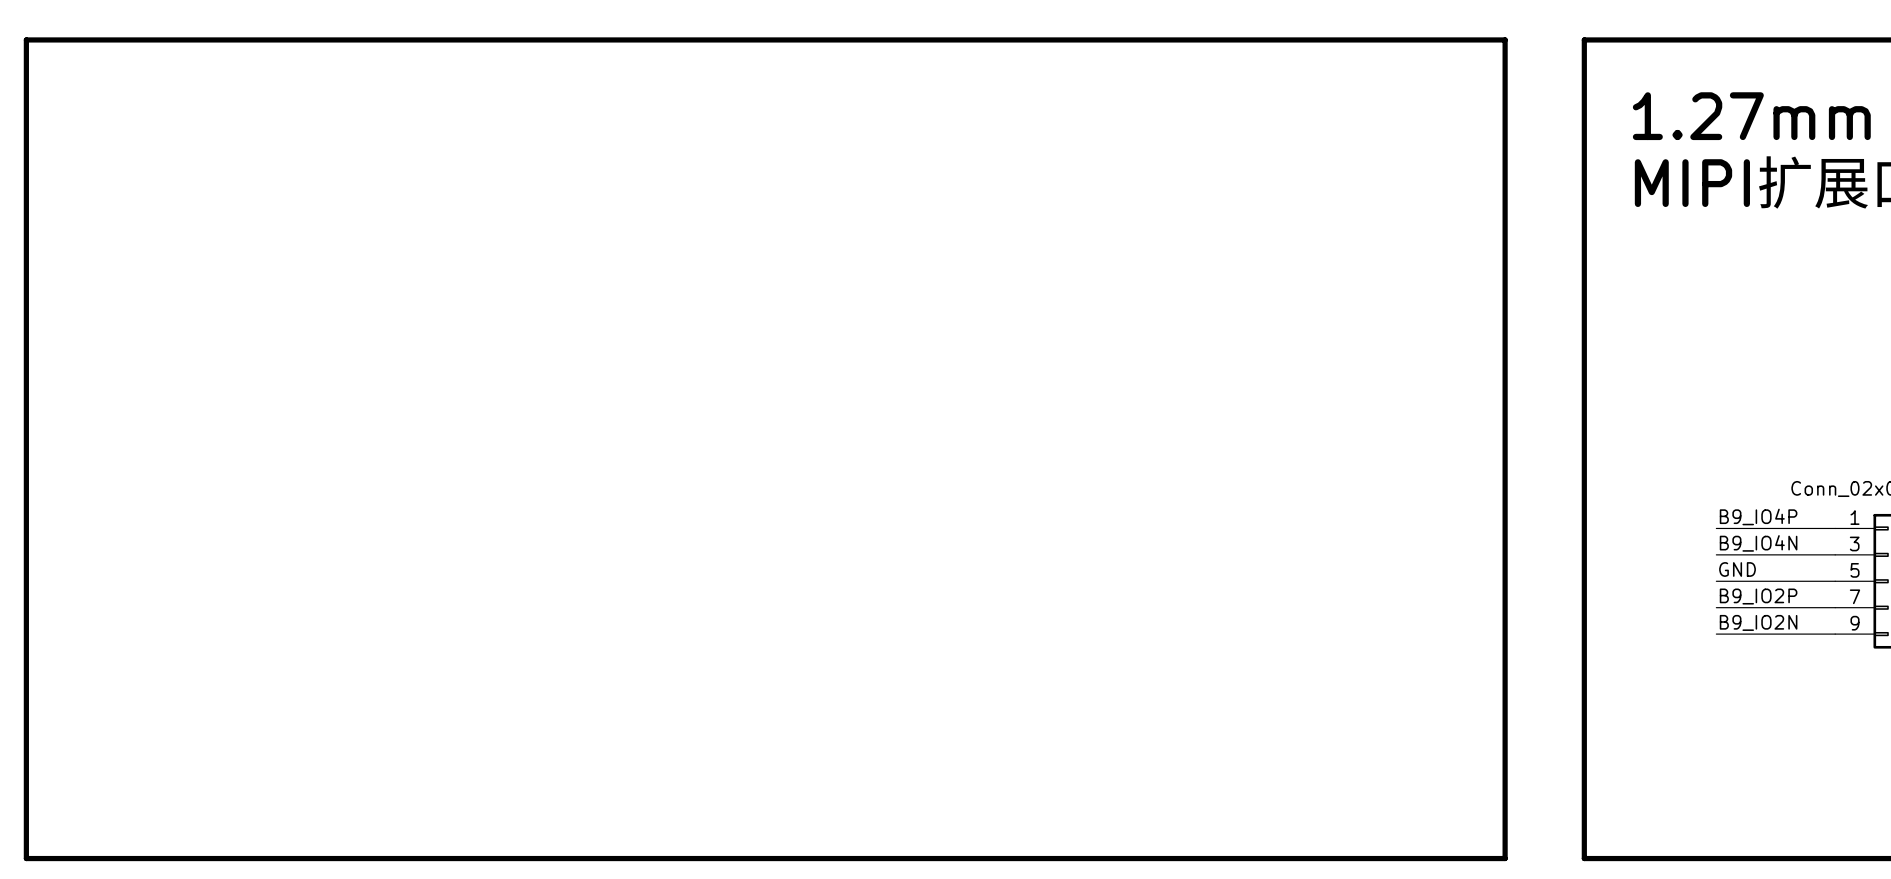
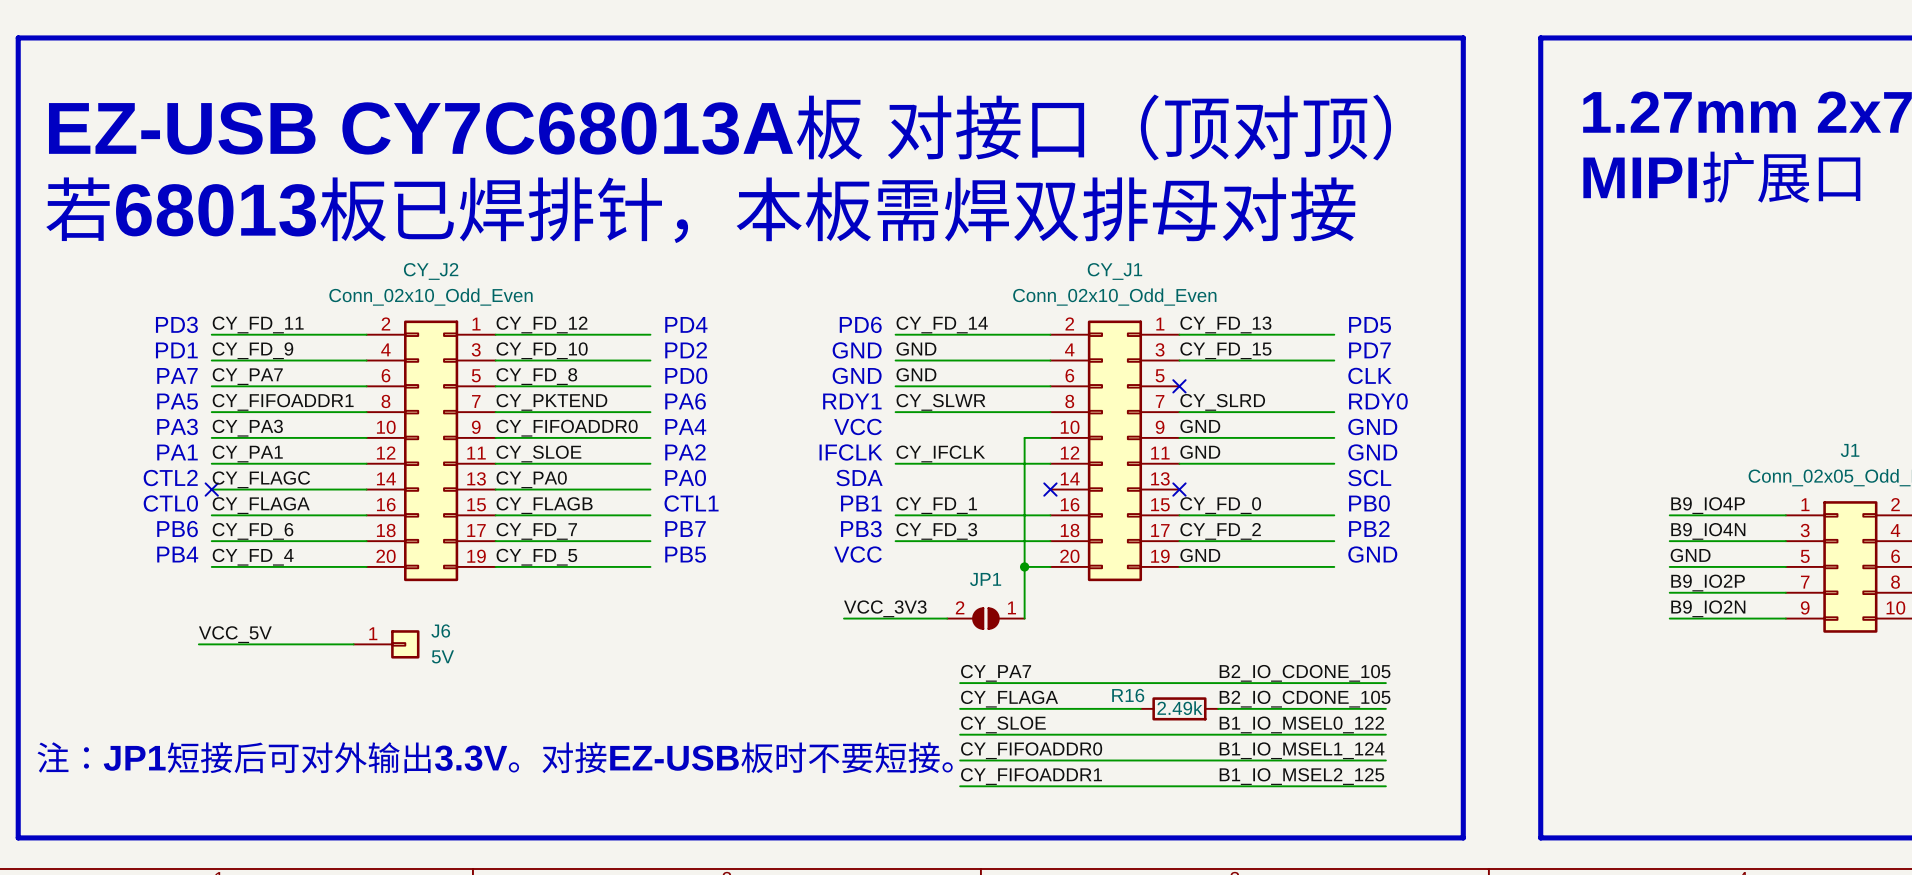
text: none -> EZ-USB CY7C68013A板 对接口（顶对顶） (720, 127)
text: none -> 若68013板已焊排针，本板需焊双排母对接 (700, 210)
label: none -> CY_FD_11 (258, 324)
label: none -> CY_FD_12 (542, 324)
label: none -> CY_FD_14 (942, 324)
label: none -> CY_FD_13 (1225, 324)
text: none -> PD3 (176, 324)
text: none -> PD4 (686, 324)
text: none -> PD6 (860, 324)
text: none -> PD5 (1370, 325)
wire: none -> (211, 334) (366, 334)
wire: none -> (495, 334) (650, 334)
wire: none -> (895, 334) (1050, 334)
wire: none -> (1179, 334) (1334, 334)
label: none -> CY_FD_9 (252, 350)
label: none -> CY_FD_10 (542, 350)
label: none -> GND (916, 349)
label: none -> CY_FD_15 (1225, 350)
text: none -> PD1 (176, 350)
text: none -> PD2 (686, 350)
text: none -> GND (857, 350)
text: none -> PD7 (1369, 350)
wire: none -> (211, 360) (366, 360)
wire: none -> (495, 360) (650, 360)
wire: none -> (895, 360) (1050, 360)
wire: none -> (1179, 360) (1334, 360)
label: none -> GND (916, 374)
text: none -> PA7 (177, 375)
label: none -> CY_PA7 (247, 376)
label: none -> CY_FD_8 (536, 376)
text: none -> PD0 (686, 375)
text: none -> GND (857, 375)
text: none -> CLK (1370, 375)
wire: none -> (211, 386) (366, 386)
wire: none -> (495, 386) (650, 386)
wire: none -> (895, 386) (1050, 386)
no-connect mark: none -> (1179, 386)
text: none -> PA5 (177, 401)
label: none -> CY_FIFOADDR1 (283, 402)
label: none -> CY_PKTEND (551, 402)
text: none -> PA6 (685, 401)
text: none -> RDY1 (852, 401)
label: none -> CY_SLWR (940, 402)
label: none -> CY_SLRD (1222, 402)
text: none -> RDY0 (1378, 401)
wire: none -> (211, 412) (366, 412)
wire: none -> (495, 412) (650, 412)
wire: none -> (895, 412) (1050, 412)
wire: none -> (1179, 412) (1334, 412)
text: none -> PA4 (685, 426)
label: none -> GND (1200, 426)
text: none -> PA3 (177, 426)
label: none -> CY_PA3 (247, 428)
label: none -> CY_FIFOADDR0 (567, 428)
text: none -> VCC (857, 426)
text: none -> GND (1372, 426)
wire: none -> (211, 437) (366, 437)
wire: none -> (495, 437) (650, 437)
wire: none -> (1050, 437) (1024, 437) (1024, 618)
wire: none -> (1179, 437) (1334, 437)
CY_J2: none -> Conn_02x10_Odd_Even (431, 450)
CY_J1: none -> Conn_02x10_Odd_Even (1114, 450)
label: none -> GND (1200, 452)
text: none -> PA1 (177, 452)
label: none -> CY_PA1 (247, 453)
label: none -> CY_SLOE (538, 453)
text: none -> PA2 (685, 452)
text: none -> IFCLK (850, 452)
label: none -> CY_IFCLK (940, 453)
text: none -> GND (1372, 452)
wire: none -> (211, 463) (366, 463)
wire: none -> (495, 463) (650, 463)
wire: none -> (895, 463) (1050, 463)
wire: none -> (1179, 463) (1334, 463)
text: none -> CTL2 (170, 478)
label: none -> CY_FLAGC (261, 479)
label: none -> CY_PA0 (531, 479)
text: none -> PA0 (685, 478)
text: none -> SDA (859, 478)
text: none -> SCL (1369, 478)
wire: none -> (211, 489) (366, 489)
no-connect mark: none -> (211, 489)
wire: none -> (495, 489) (650, 489)
no-connect mark: none -> (1050, 489)
no-connect mark: none -> (1179, 489)
text: none -> CTL0 (170, 503)
text: none -> CTL1 (691, 503)
text: none -> PB1 (861, 503)
text: none -> PB0 (1369, 503)
label: none -> CY_FLAGA (261, 505)
label: none -> CY_FLAGB (544, 505)
label: none -> CY_FD_1 (936, 505)
label: none -> CY_FD_0 (1220, 505)
wire: none -> (211, 515) (366, 515)
wire: none -> (495, 515) (650, 515)
wire: none -> (895, 515) (1050, 515)
wire: none -> (1179, 515) (1334, 515)
text: none -> PB6 (177, 529)
text: none -> PB7 (685, 529)
text: none -> PB3 (861, 529)
text: none -> PB2 (1369, 528)
label: none -> CY_FD_6 (253, 531)
label: none -> CY_FD_7 (536, 531)
label: none -> CY_FD_3 (936, 531)
label: none -> CY_FD_2 (1220, 531)
wire: none -> (211, 541) (366, 541)
wire: none -> (495, 541) (650, 541)
wire: none -> (895, 541) (1050, 541)
wire: none -> (1179, 541) (1334, 541)
text: none -> PB4 (177, 554)
text: none -> PB5 (685, 554)
text: none -> VCC (857, 554)
text: none -> GND (1372, 554)
label: none -> CY_FD_4 (253, 557)
label: none -> GND (1200, 555)
label: none -> CY_FD_5 (536, 557)
wire: none -> (211, 566) (366, 566)
wire: none -> (495, 566) (650, 566)
wire: none -> (1024, 566) (1050, 566)
junction: none -> (1024, 566)
wire: none -> (1179, 566) (1334, 566)
label: none -> VCC_3V3 (885, 608)
wire: none -> (843, 618) (947, 618)
JP1: none -> (985, 618)
label: none -> VCC_5V (235, 634)
wire: none -> (198, 644) (353, 644)
J6: none -> 5V (386, 644)
label: none -> CY_PA7 (996, 673)
label: none -> B2_IO_CDONE_105 (1305, 673)
wire: none -> (960, 683) (1385, 683)
label: none -> CY_FLAGA (1009, 699)
label: none -> B2_IO_CDONE_105 (1305, 699)
wire: none -> (960, 708) (1140, 708)
R16: none -> 2.49k (1179, 708)
wire: none -> (1218, 708) (1385, 708)
label: none -> CY_SLOE (1003, 724)
label: none -> B1_IO_MSEL0_122 (1301, 724)
wire: none -> (960, 734) (1385, 734)
label: none -> B1_IO_MSEL1_124 (1302, 750)
label: none -> CY_FIFOADDR0 (1031, 750)
text: none -> 注：JP1短接后可对外输出3.3V。对接EZ-USB板时不要短接。 (495, 757)
wire: none -> (960, 760) (1385, 760)
label: none -> CY_FIFOADDR1 (1031, 776)
label: none -> B1_IO_MSEL2_125 (1301, 776)
wire: none -> (960, 786) (1385, 786)

